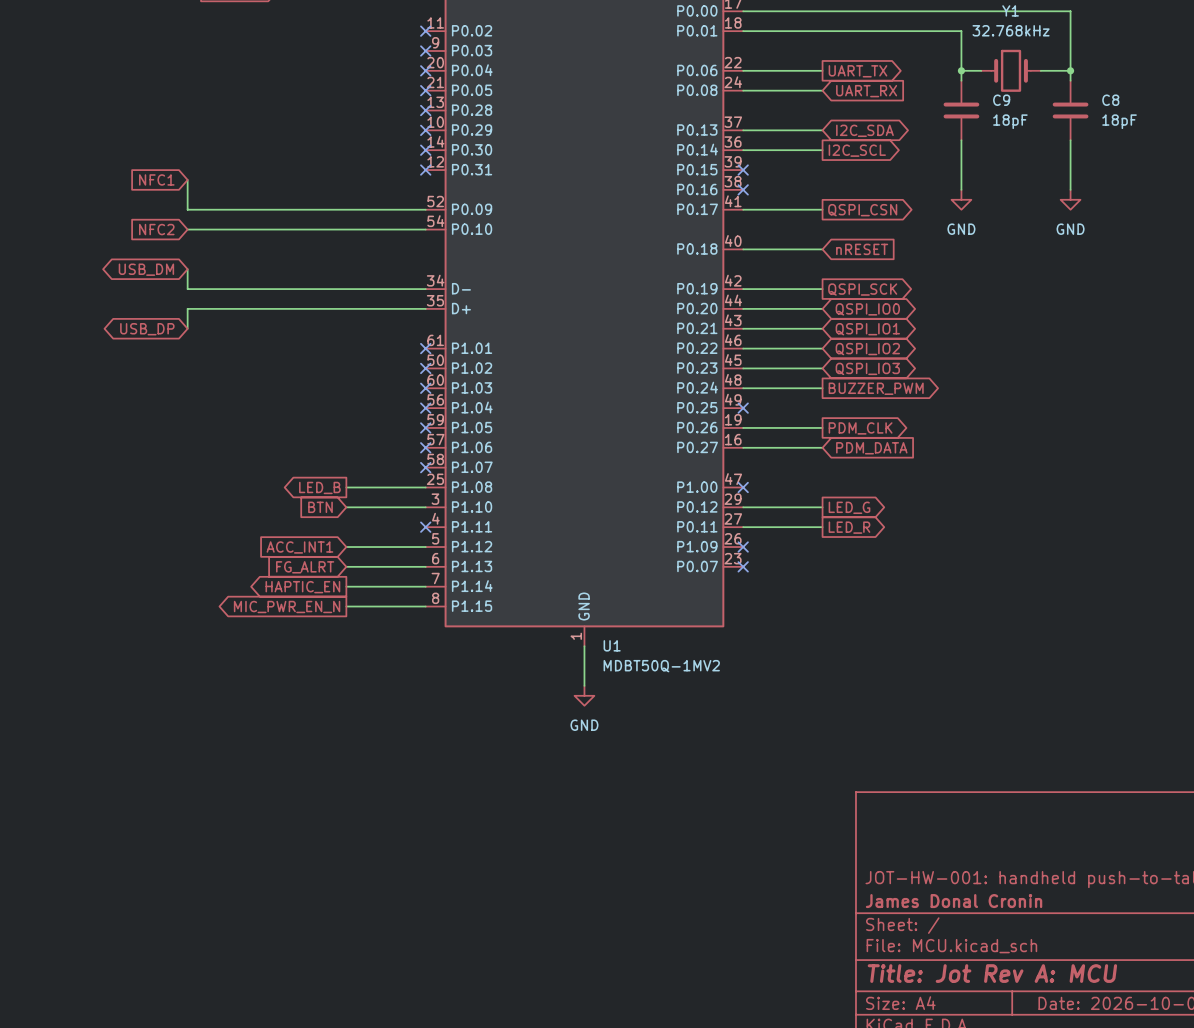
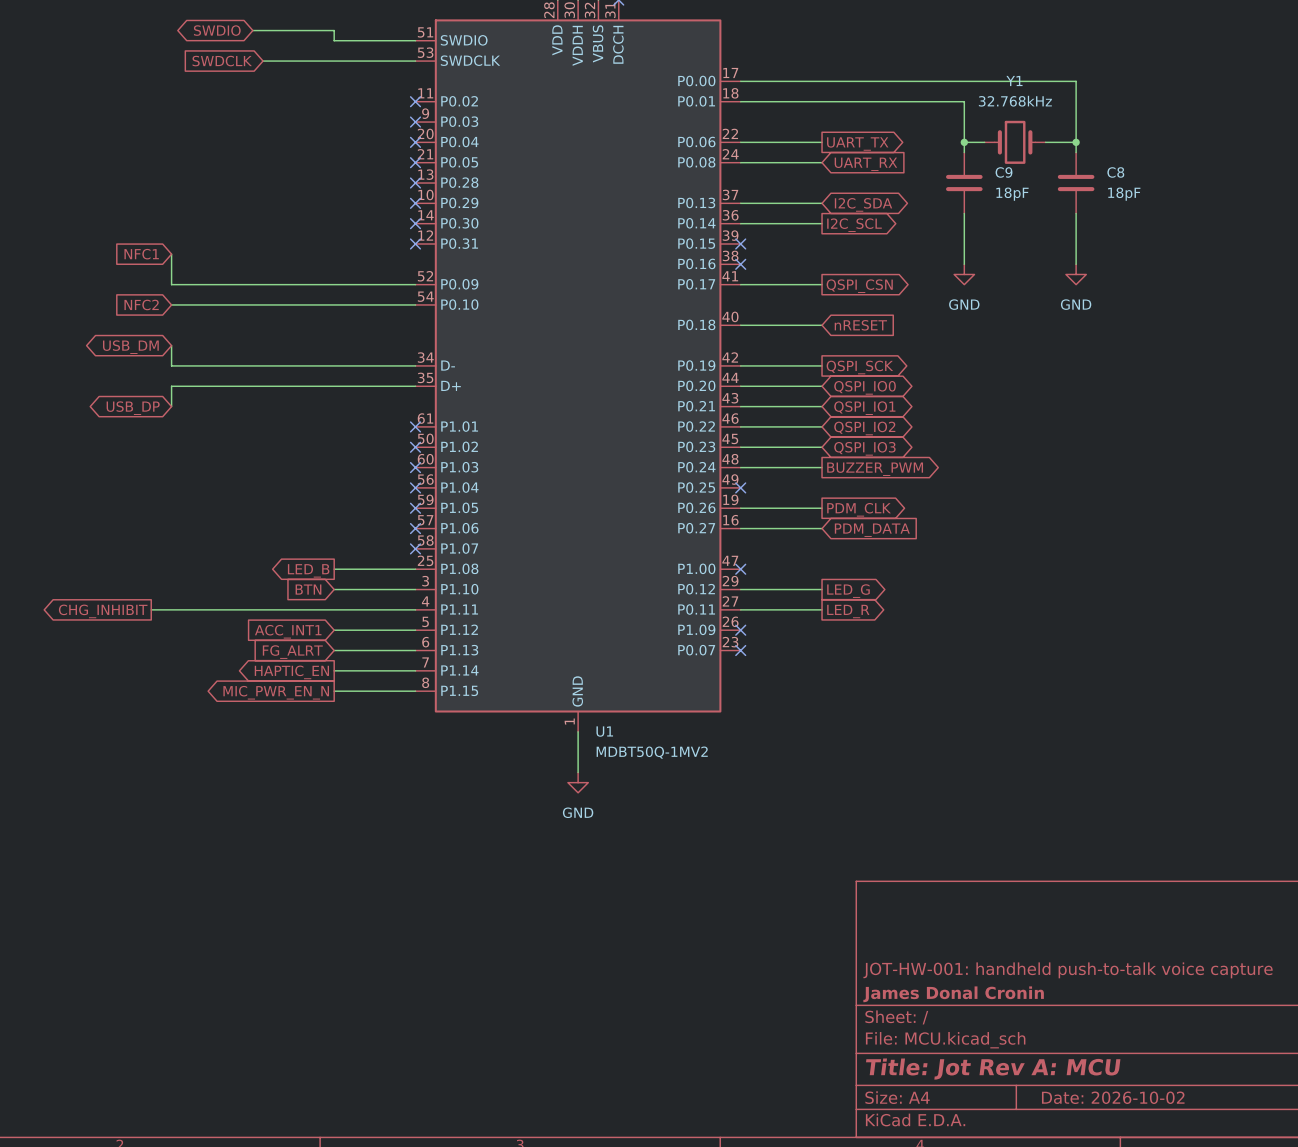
global label: none -> CHG_INHIBIT (103, 611)
wire: none -> (151, 609) (415, 609)
no-connect mark: (425, 527) -> none

